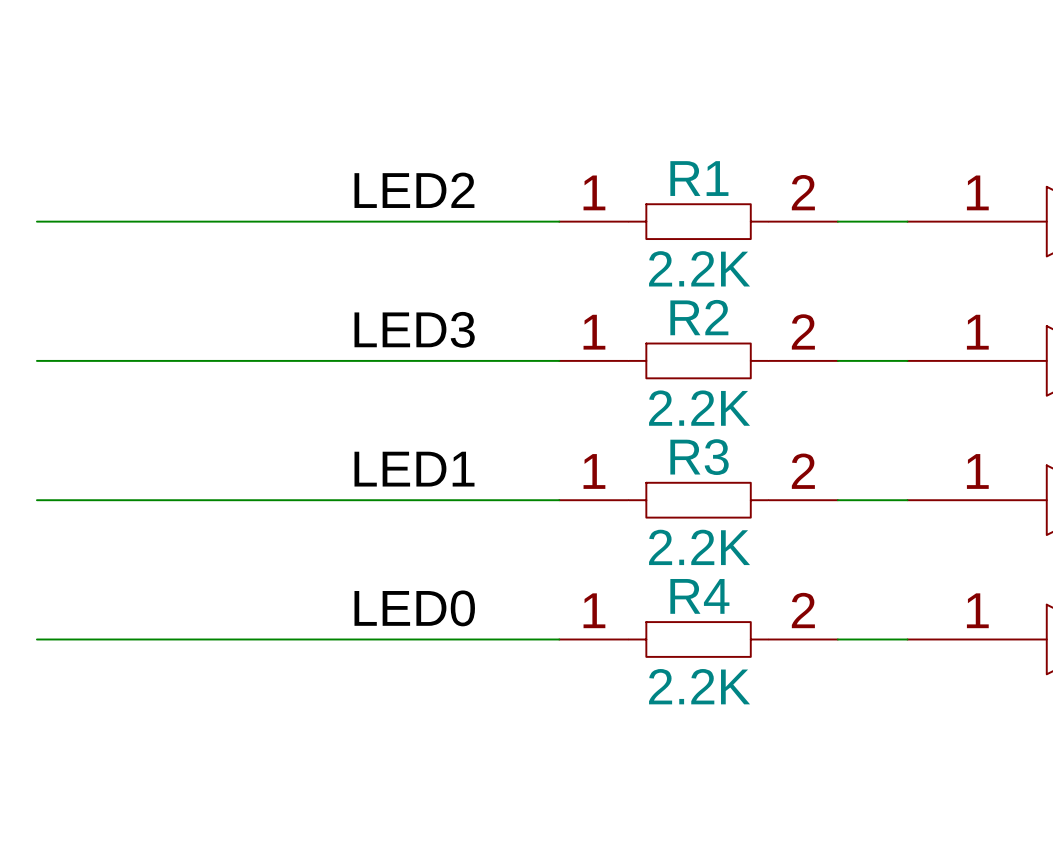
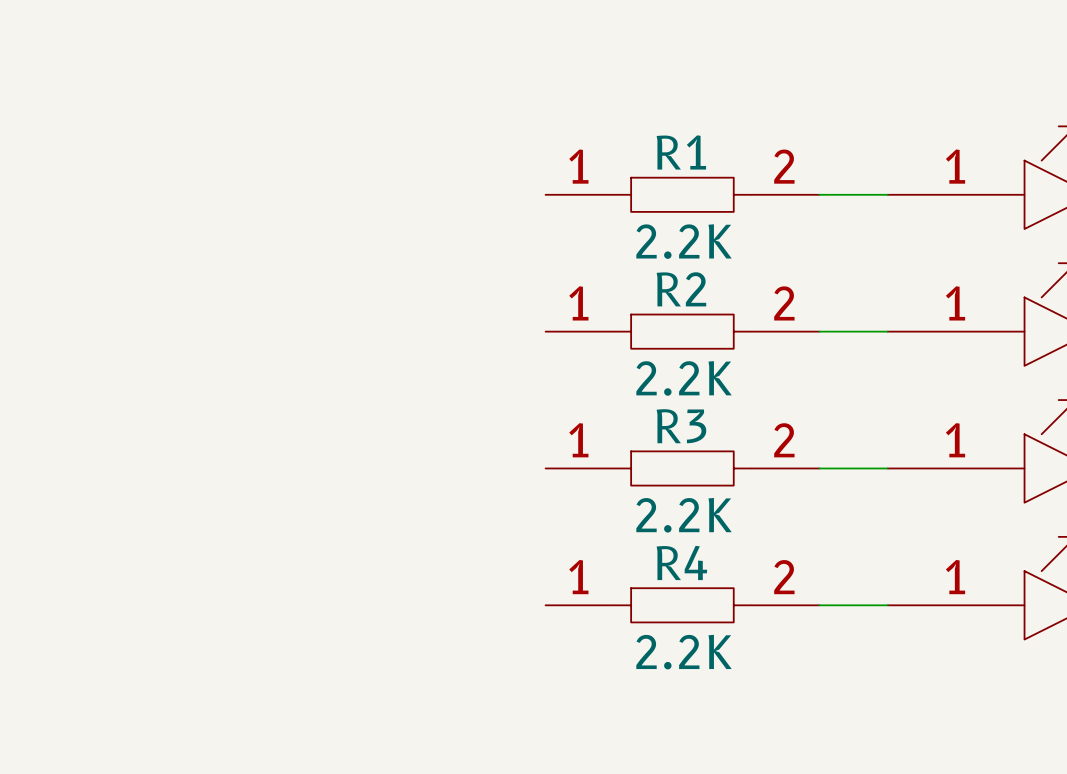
label: LED2 (414, 190) -> none
wire: (36, 221) (559, 221) -> none
label: LED3 (414, 329) -> none
wire: (36, 360) (559, 360) -> none
label: LED1 (414, 469) -> none
wire: (36, 500) (559, 500) -> none
label: LED0 (414, 608) -> none
wire: (36, 639) (559, 639) -> none

